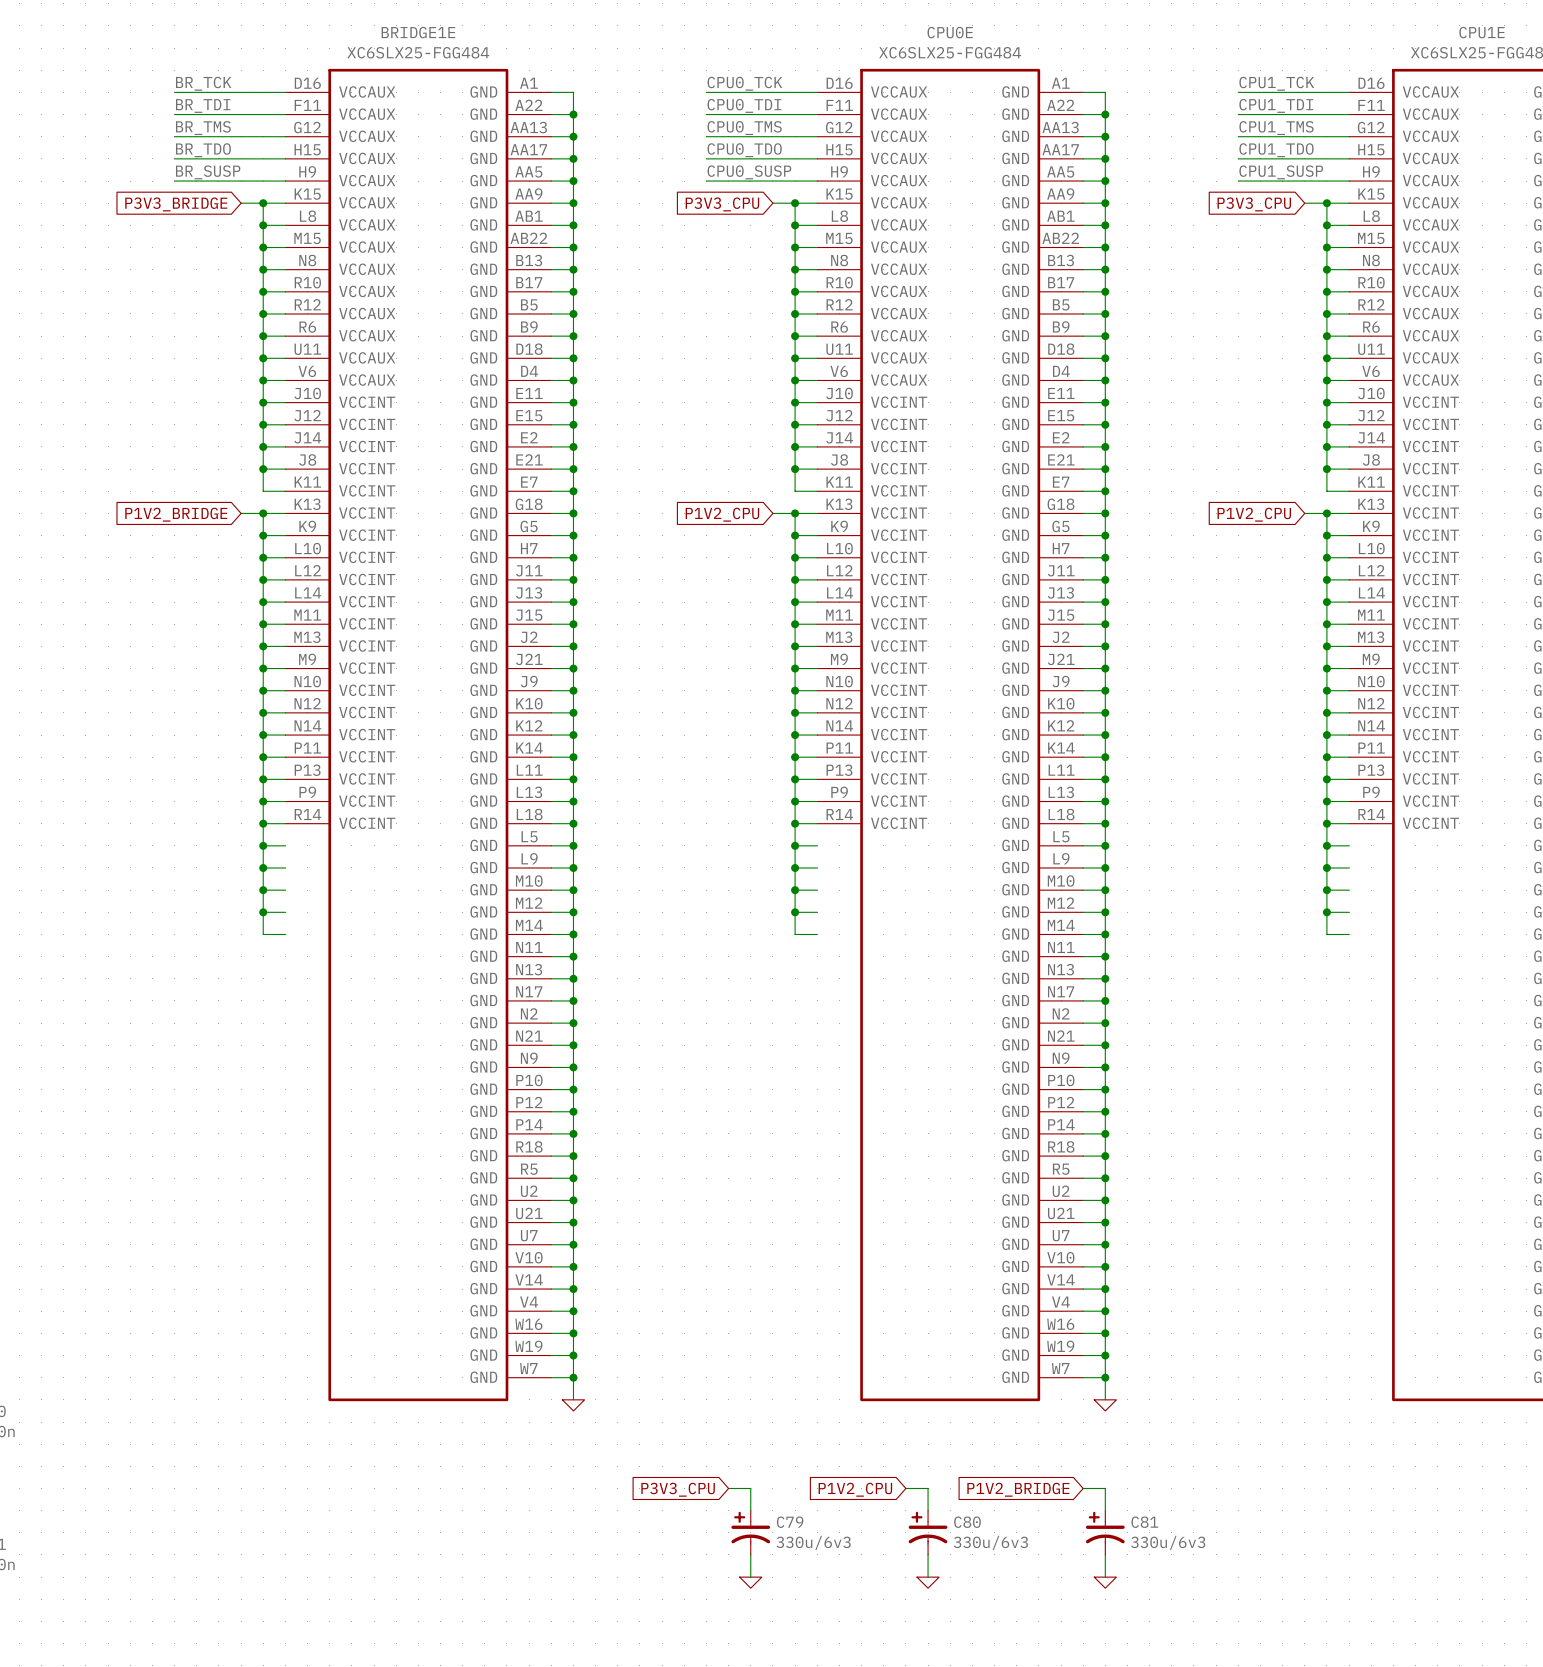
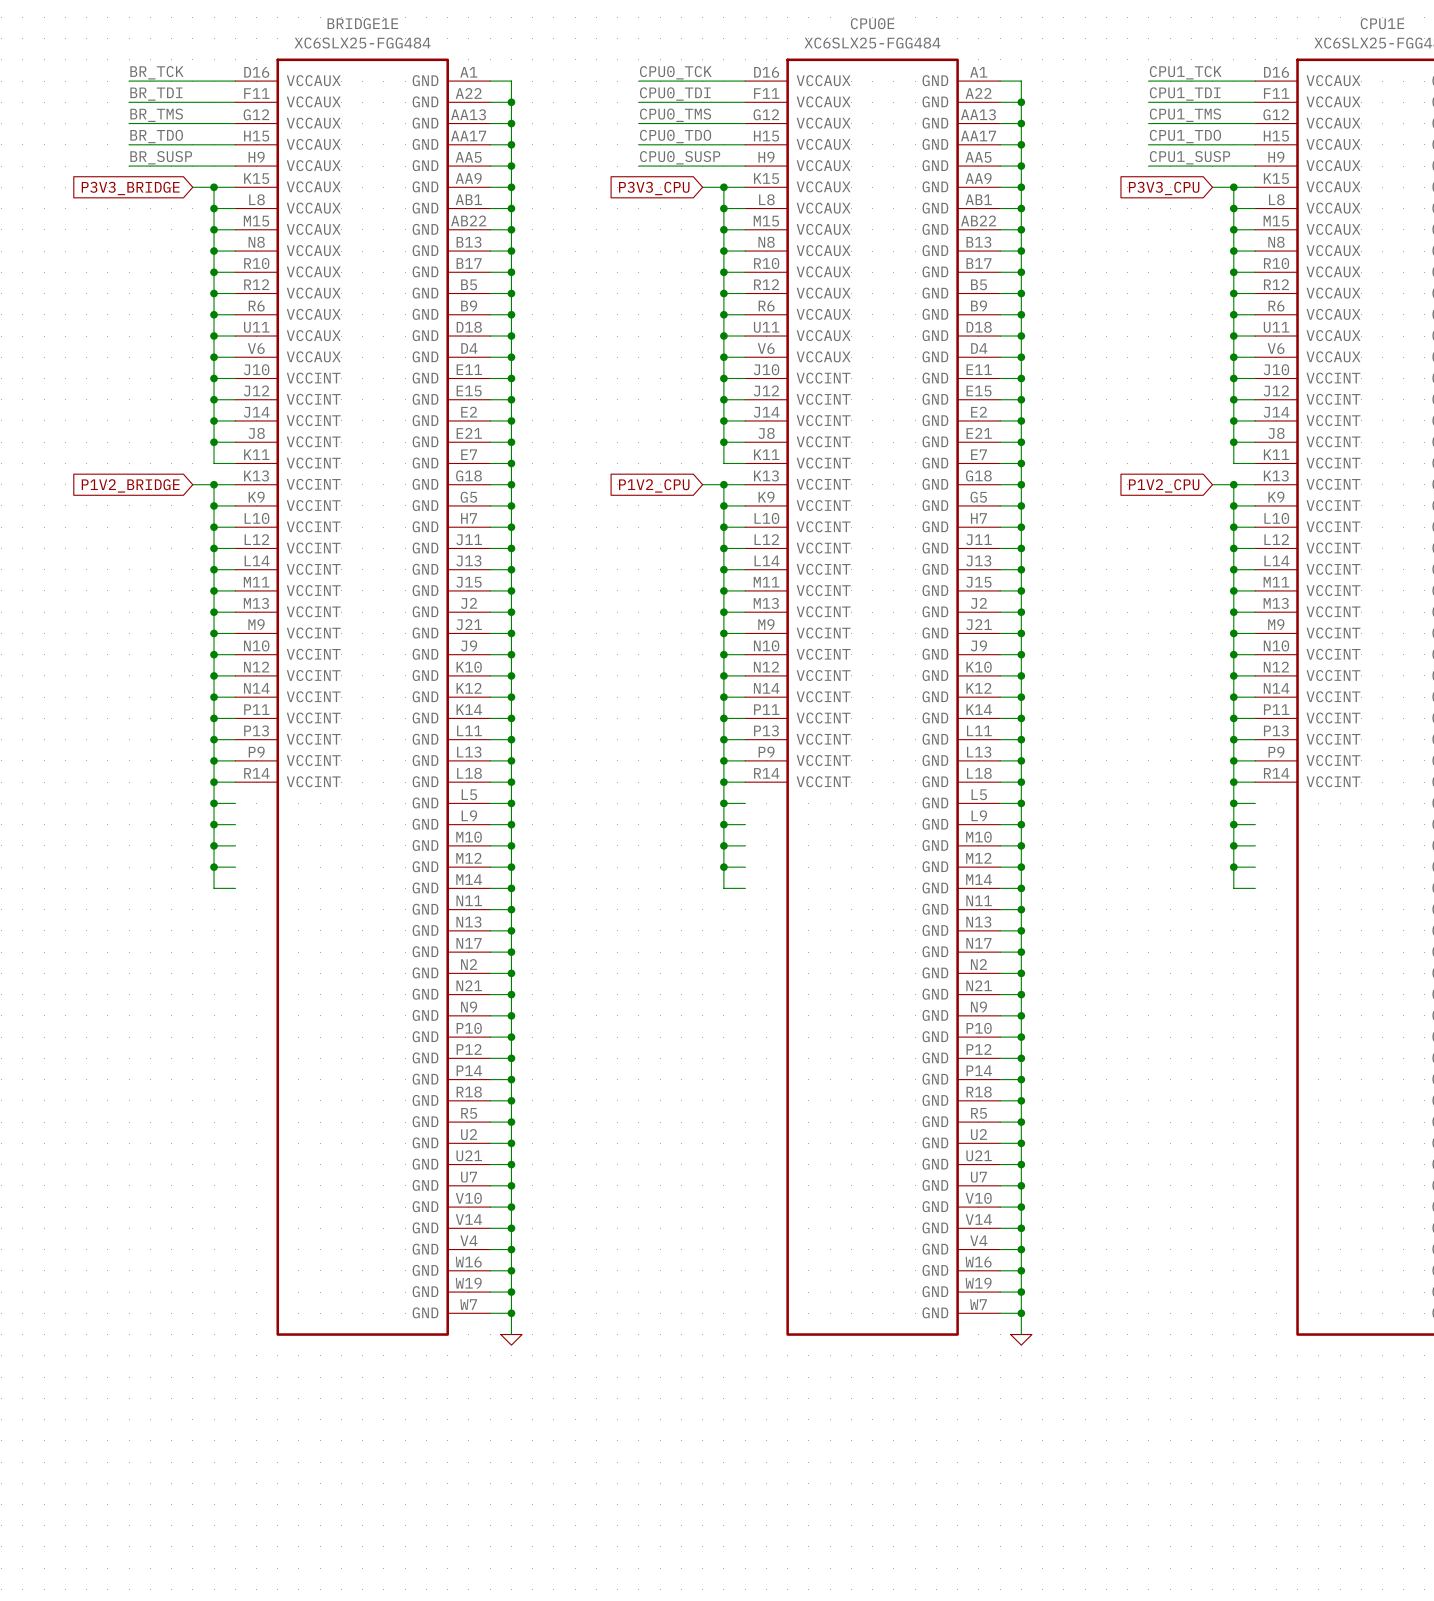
wire: (728, 1488) (750, 1488) (750, 1510) -> none
wire: (905, 1488) (928, 1488) (928, 1510) -> none
wire: (1083, 1488) (1105, 1488) (1105, 1510) -> none
global label: P3V3_CPU (678, 1489) -> none
global label: P1V2_CPU (855, 1489) -> none
global label: P1V2_BRIDGE (1018, 1489) -> none
C79: 330u/6v3 (750, 1532) -> none
C80: 330u/6v3 (928, 1532) -> none
C81: 330u/6v3 (1105, 1532) -> none
wire: (750, 1554) (750, 1577) -> none
wire: (928, 1554) (928, 1577) -> none
wire: (1105, 1554) (1105, 1577) -> none
power symbol: (750, 1582) -> none
power symbol: (928, 1582) -> none
power symbol: (1105, 1582) -> none

